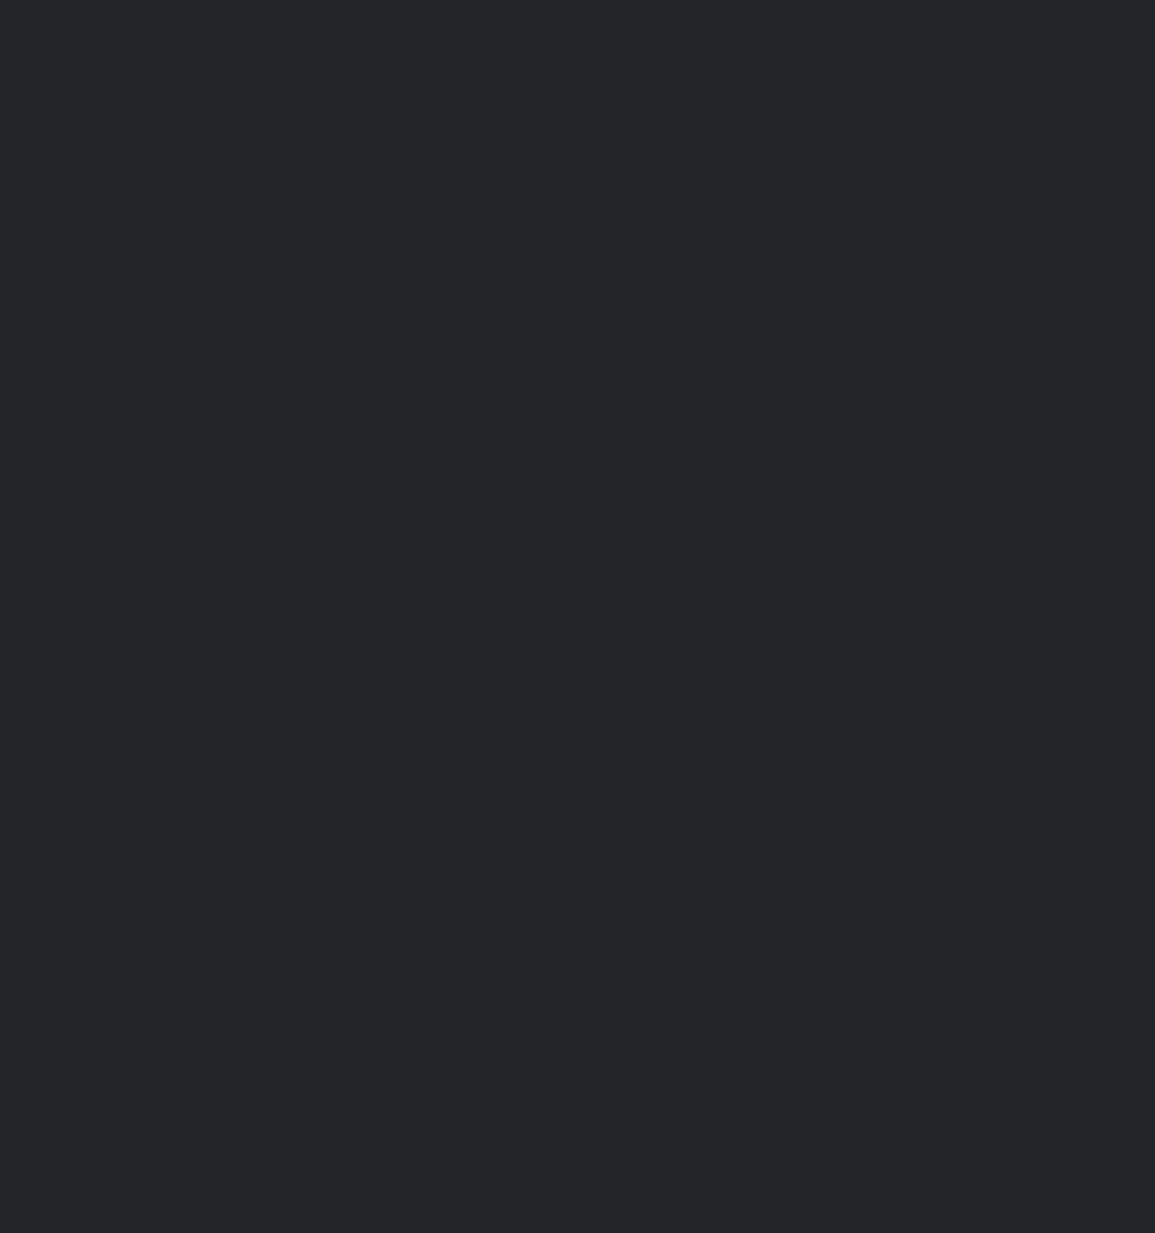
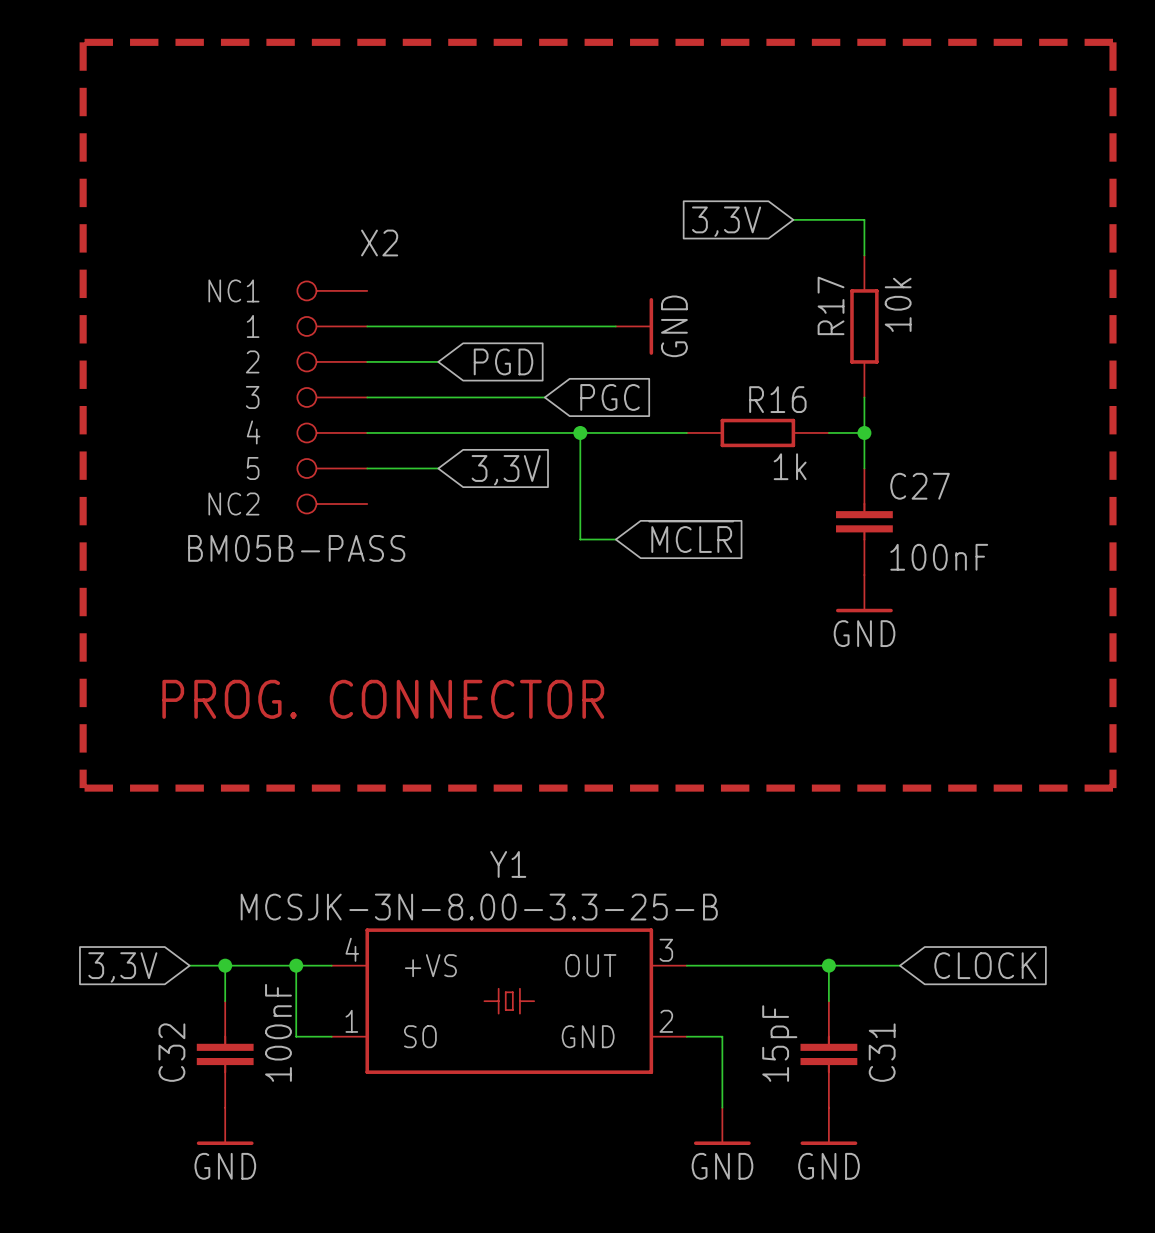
line: none -> (83, 42) (1113, 42) (1113, 788) (83, 788) (83, 42)
wire: none -> (793, 219) (864, 219) (864, 255)
global label: none -> 3,3V (726, 221)
wire: none -> (367, 326) (615, 326)
power symbol: none -> GND (634, 326)
R17: none -> 10k (864, 326)
wire: none -> (367, 361) (438, 361)
global label: none -> PGD (503, 361)
X2: none -> BM05B-PASS (332, 397)
wire: none -> (367, 397) (544, 397)
global label: none -> PGC (610, 397)
wire: none -> (864, 397) (864, 468)
wire: none -> (367, 432) (686, 432)
wire: none -> (580, 432) (580, 539) (615, 539)
junction: none -> (580, 432)
R16: none -> 1k (757, 432)
wire: none -> (828, 432) (864, 432)
junction: none -> (864, 432)
wire: none -> (367, 468) (438, 468)
global label: none -> 3,3V (506, 470)
C27: none -> 100nF (864, 521)
global label: none -> ~{MCLR} (691, 536)
power symbol: none -> GND (864, 593)
text: none -> PROG. CONNECTOR (383, 699)
wire: none -> (189, 965) (331, 965)
wire: none -> (225, 965) (225, 1001)
junction: none -> (225, 965)
wire: none -> (296, 965) (296, 1036) (331, 1036)
junction: none -> (296, 965)
wire: none -> (686, 965) (899, 965)
wire: none -> (828, 965) (828, 1001)
junction: none -> (828, 965)
global label: none -> CLOCK (985, 965)
global label: none -> 3,3V (122, 967)
Y1: none -> MCSJK-3N-8.00-3.3-25-B (509, 1001)
wire: none -> (686, 1036) (722, 1036) (722, 1107)
C32: none -> 100nF (225, 1054)
C31: none -> 15pF (828, 1054)
power symbol: none -> GND (225, 1126)
power symbol: none -> GND (722, 1126)
power symbol: none -> GND (828, 1126)

